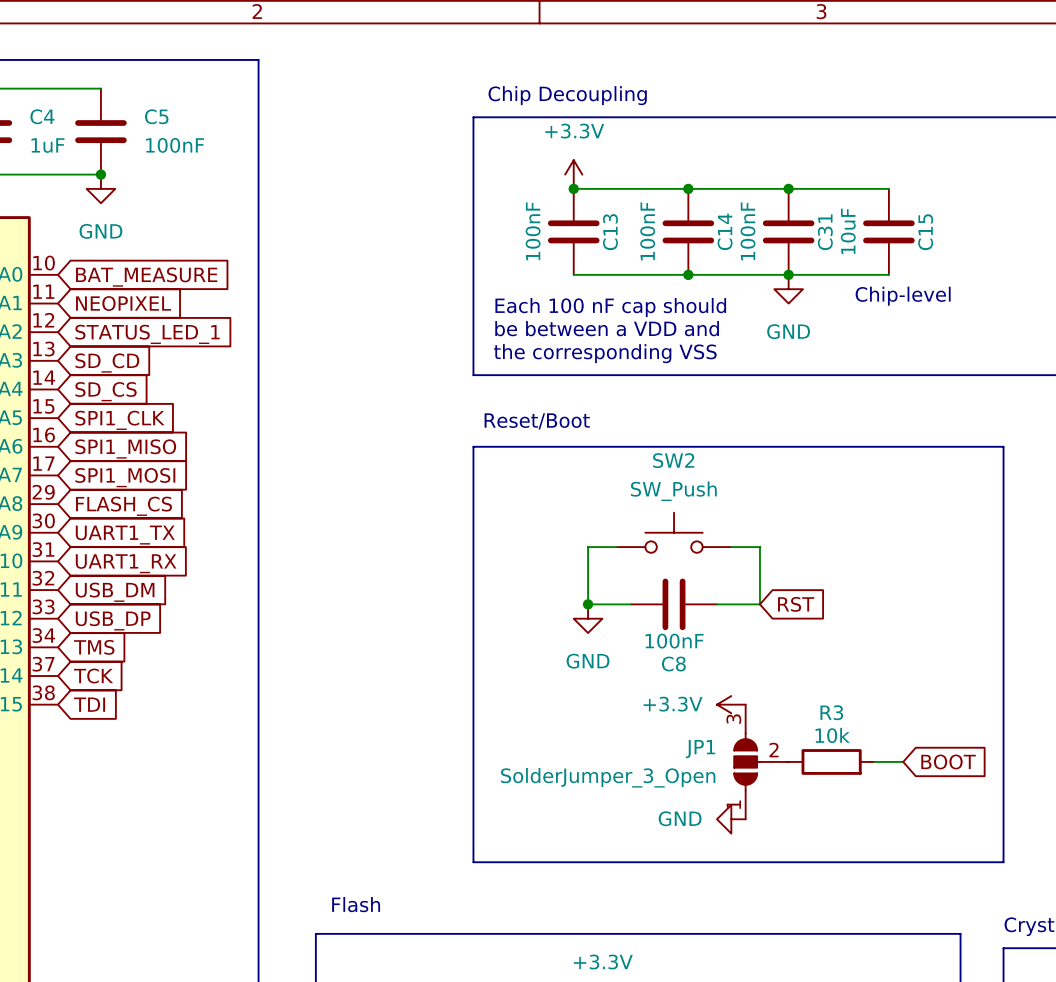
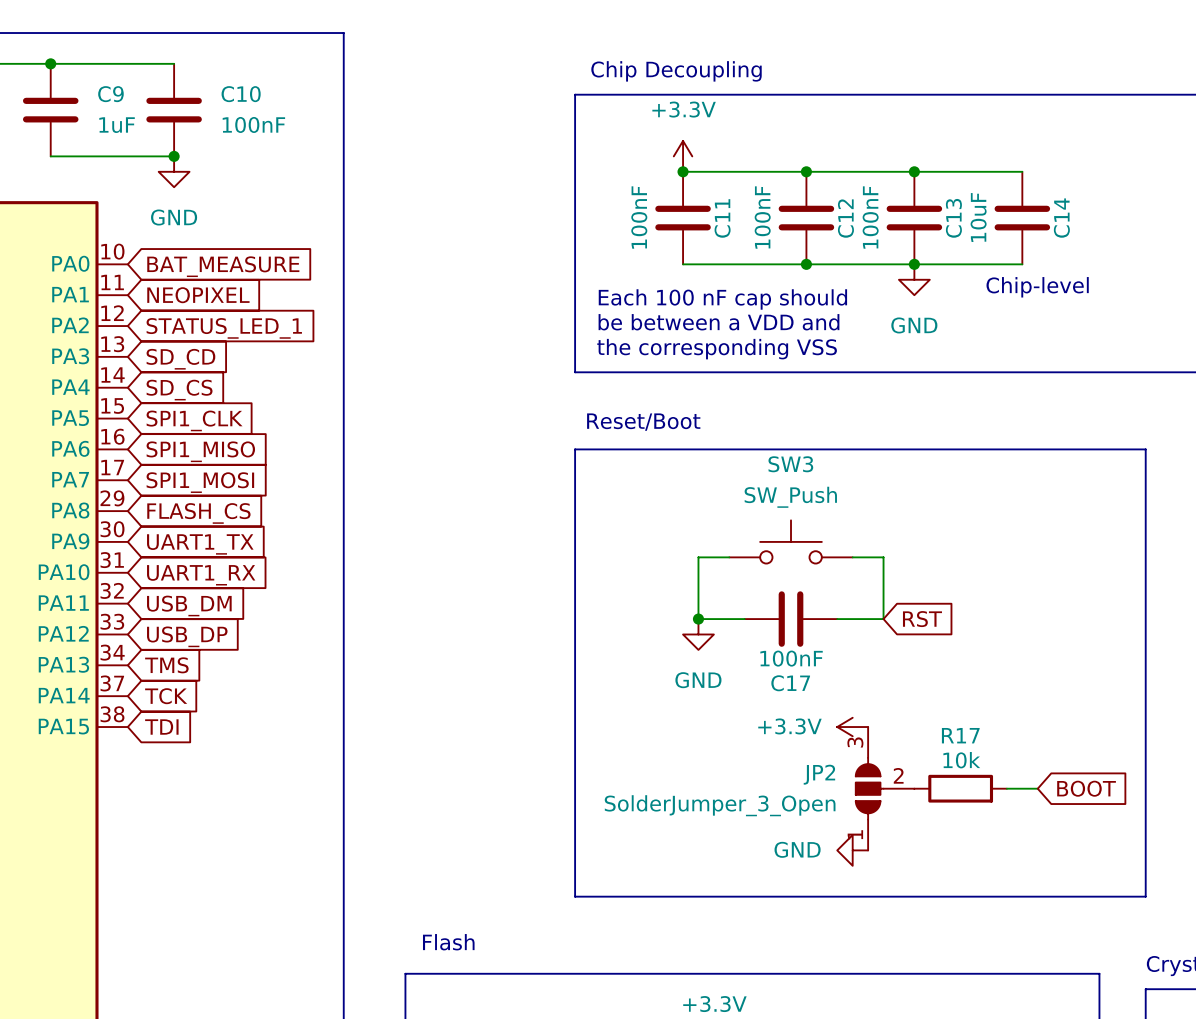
C4 name: C4 (42, 116) -> C9 (110, 94)
C5 name: C5 (156, 116) -> C10 (241, 94)
C14 name: C14 (725, 231) -> C12 (845, 218)
C13 name: C13 (610, 232) -> C11 (722, 218)
C31 name: C31 (825, 232) -> C13 (953, 218)
C15 name: C15 (925, 232) -> C14 (1061, 218)
SW2 name: SW2 (673, 460) -> SW3 (790, 464)
C8 name: C8 (673, 664) -> C17 (790, 683)
R3 name: R3 (831, 712) -> R17 (960, 735)
JP1 name: JP1 (700, 749) -> JP2 (819, 774)

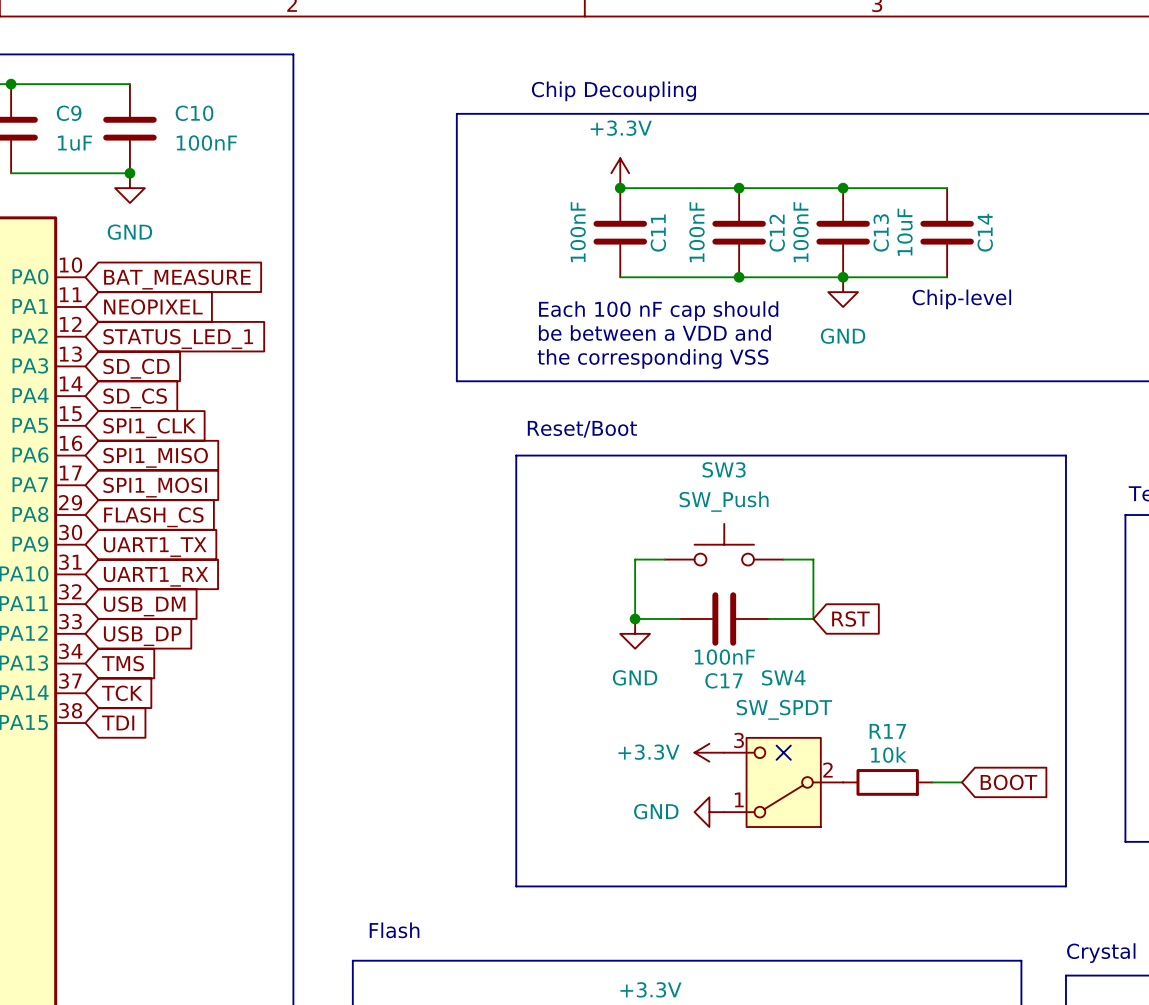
line: (575, 94) (575, 372) -> (516, 113) (456, 113) (456, 381) (516, 381)
power symbol position: +3.3V (852, 727) -> +3.3V (709, 752)
no-connect mark: none -> (783, 752)
SW4: none -> SW_SPDT (783, 782)
JP2: SolderJumper_3_Open (885, 788) -> none
power symbol position: GND (852, 850) -> GND (709, 812)

